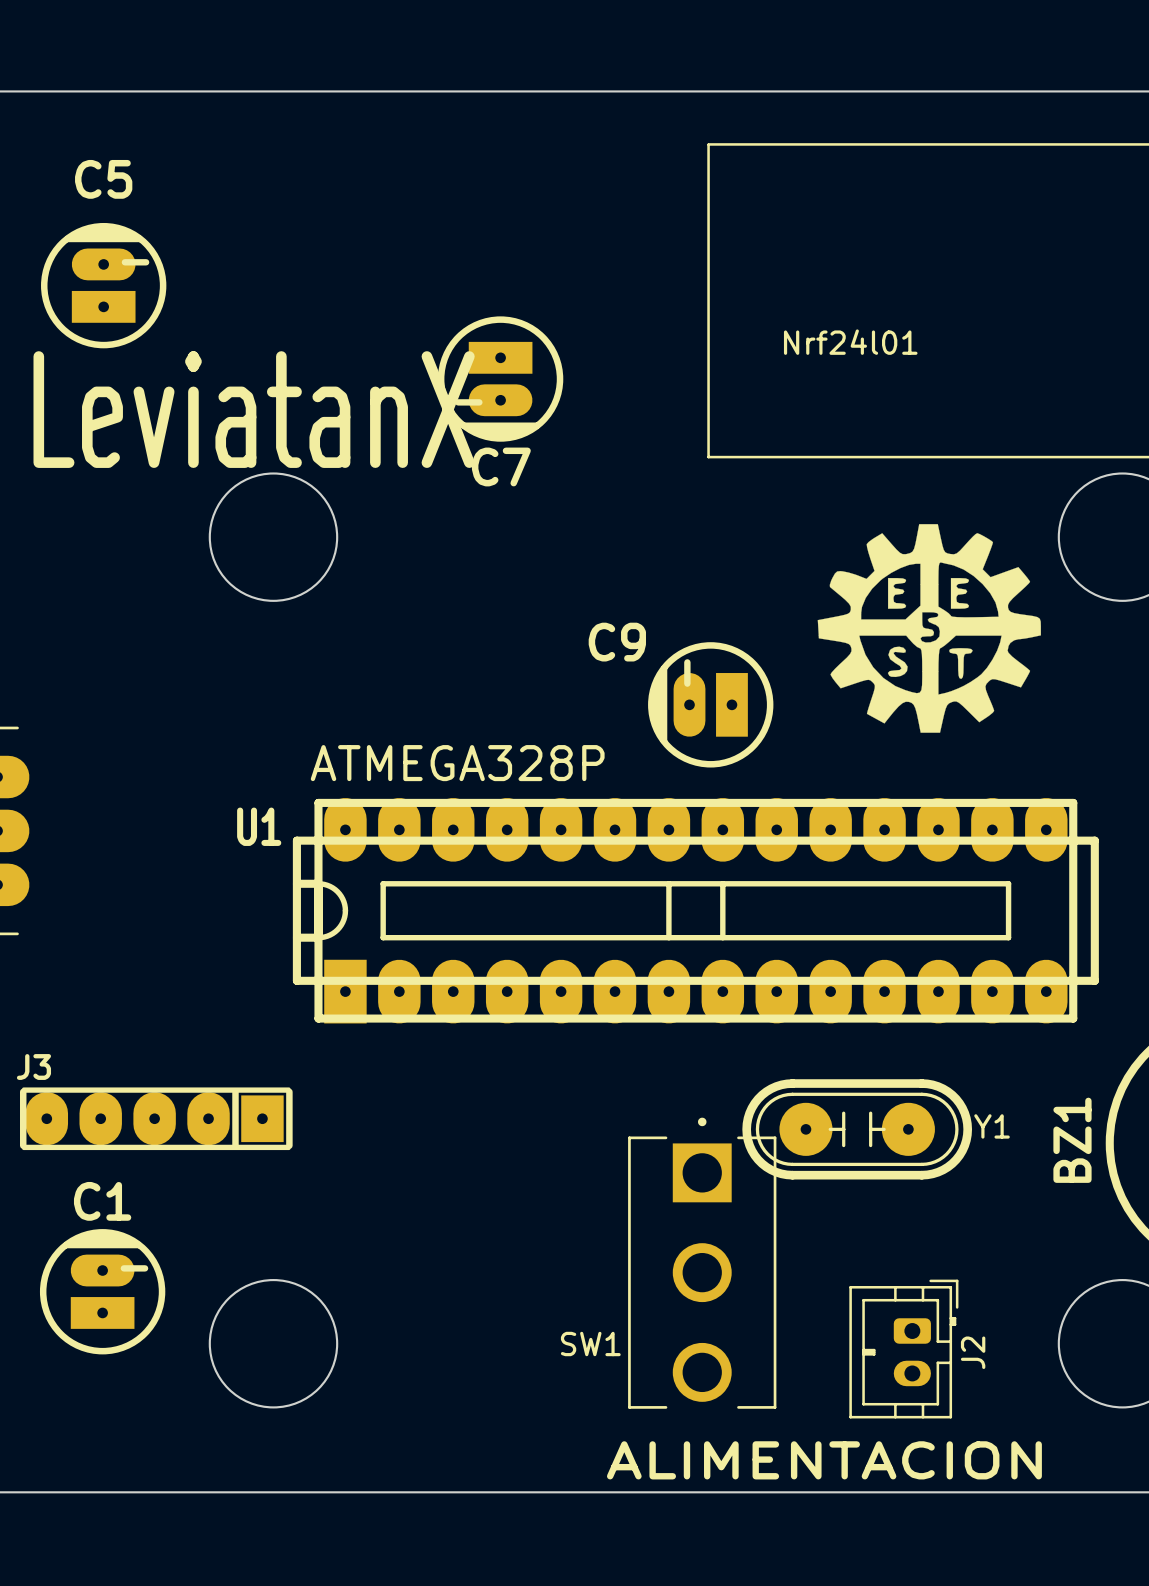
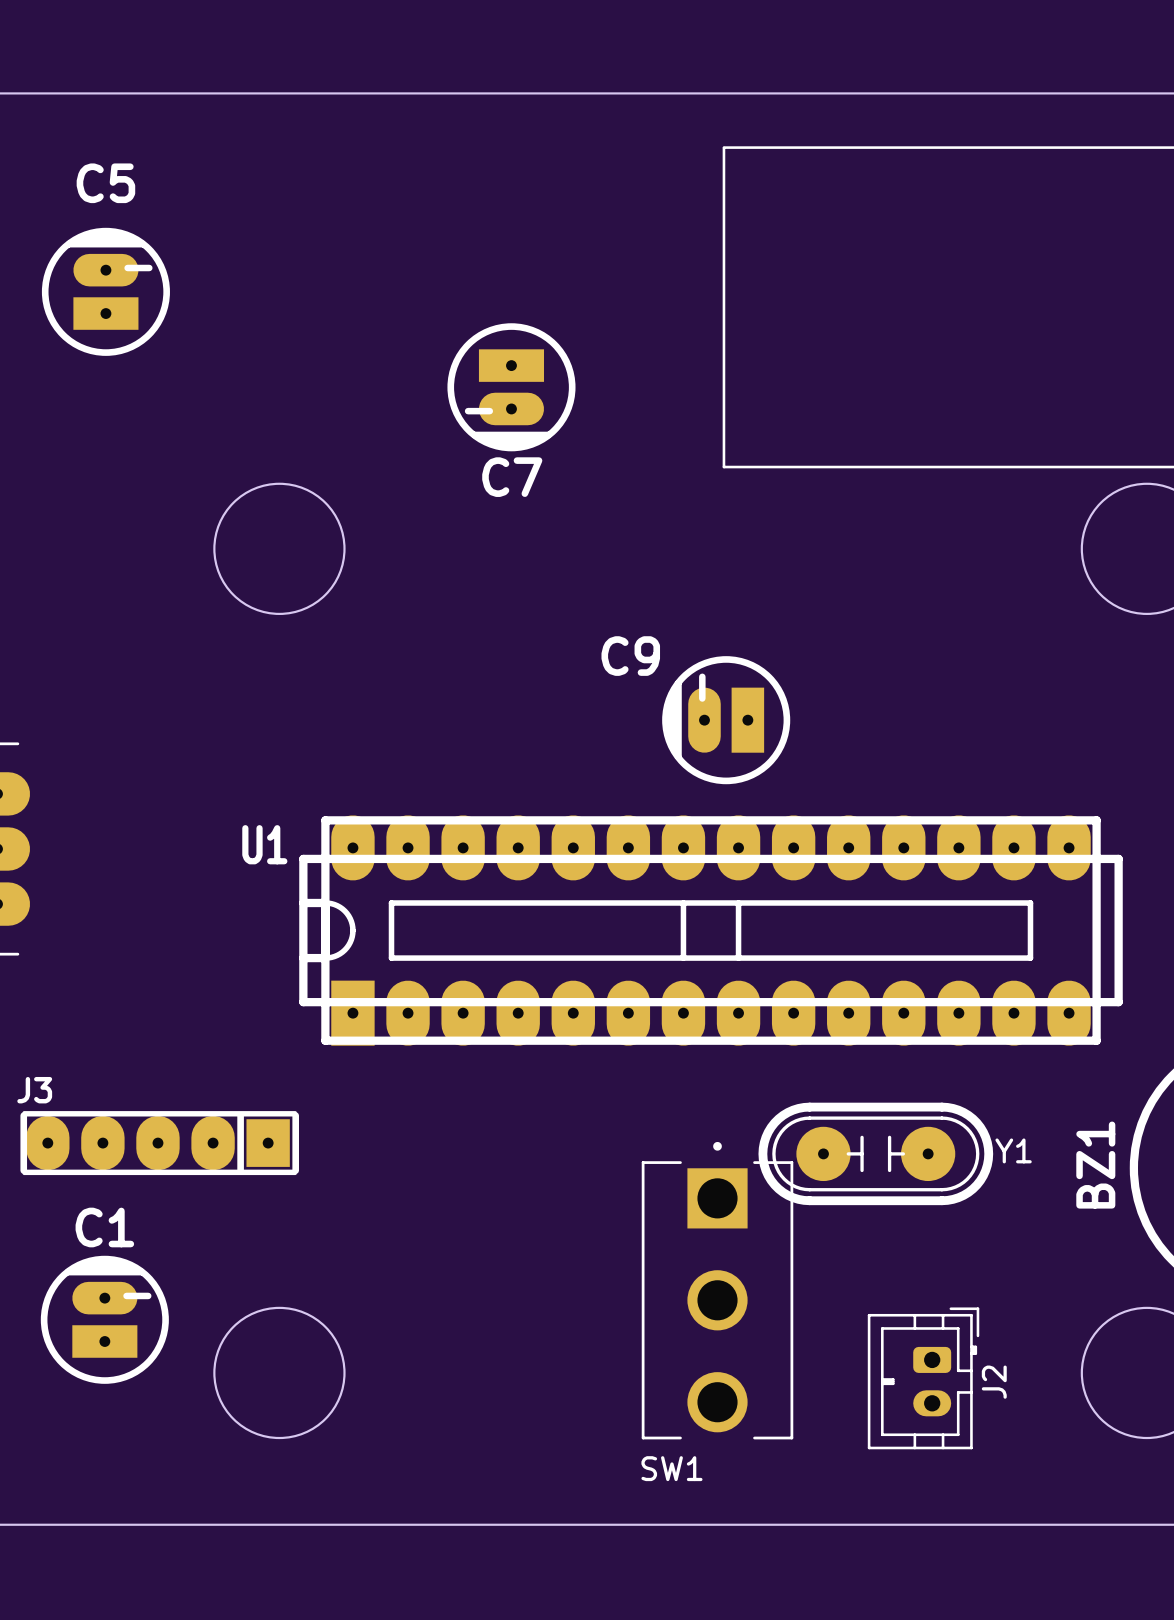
part value: Nrf24l01 (850, 342) -> none
text: LeviatanX (254, 409) -> none
drawing: [817, 524, 1041, 733] -> none
U1 value: ATMEGA328P (457, 763) -> none
SW1 name position: SW1 (590, 1344) -> SW1 (671, 1468)
J2 value: ALIMENTACION (824, 1460) -> none

